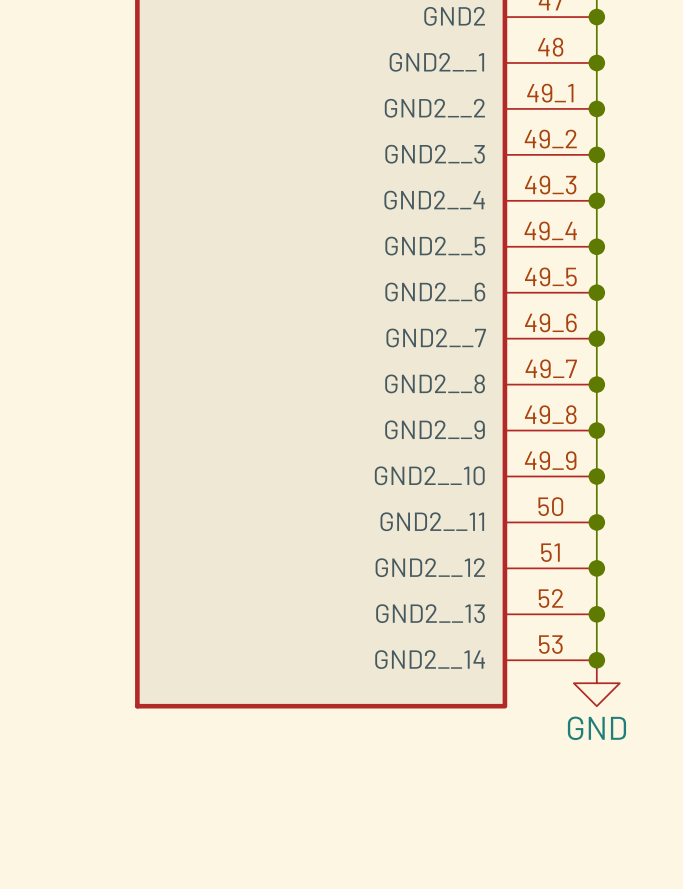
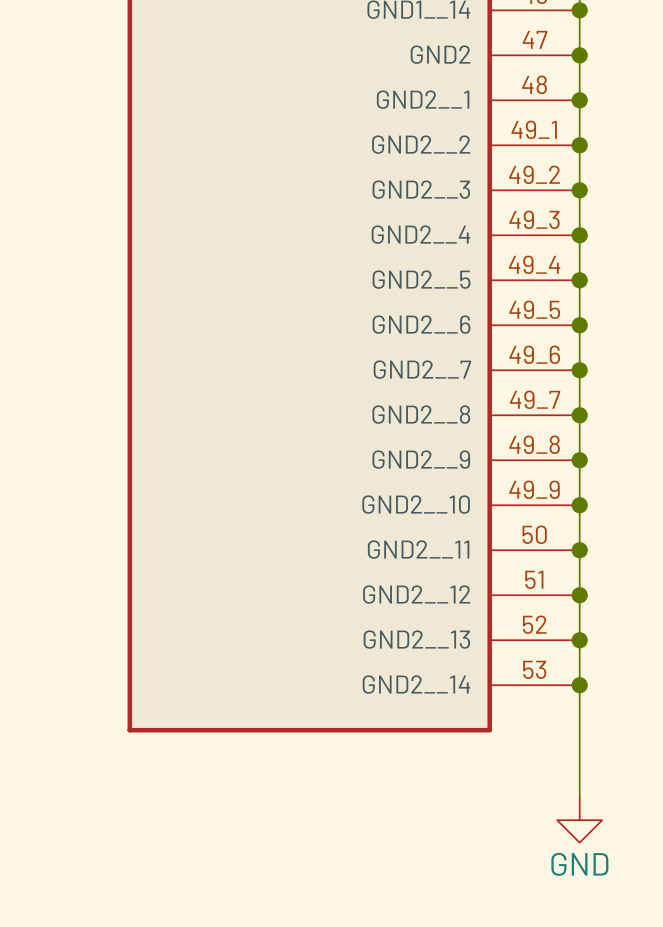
wire: none -> (579, 685) (579, 797)
power symbol position: GND (596, 683) -> GND (579, 820)

